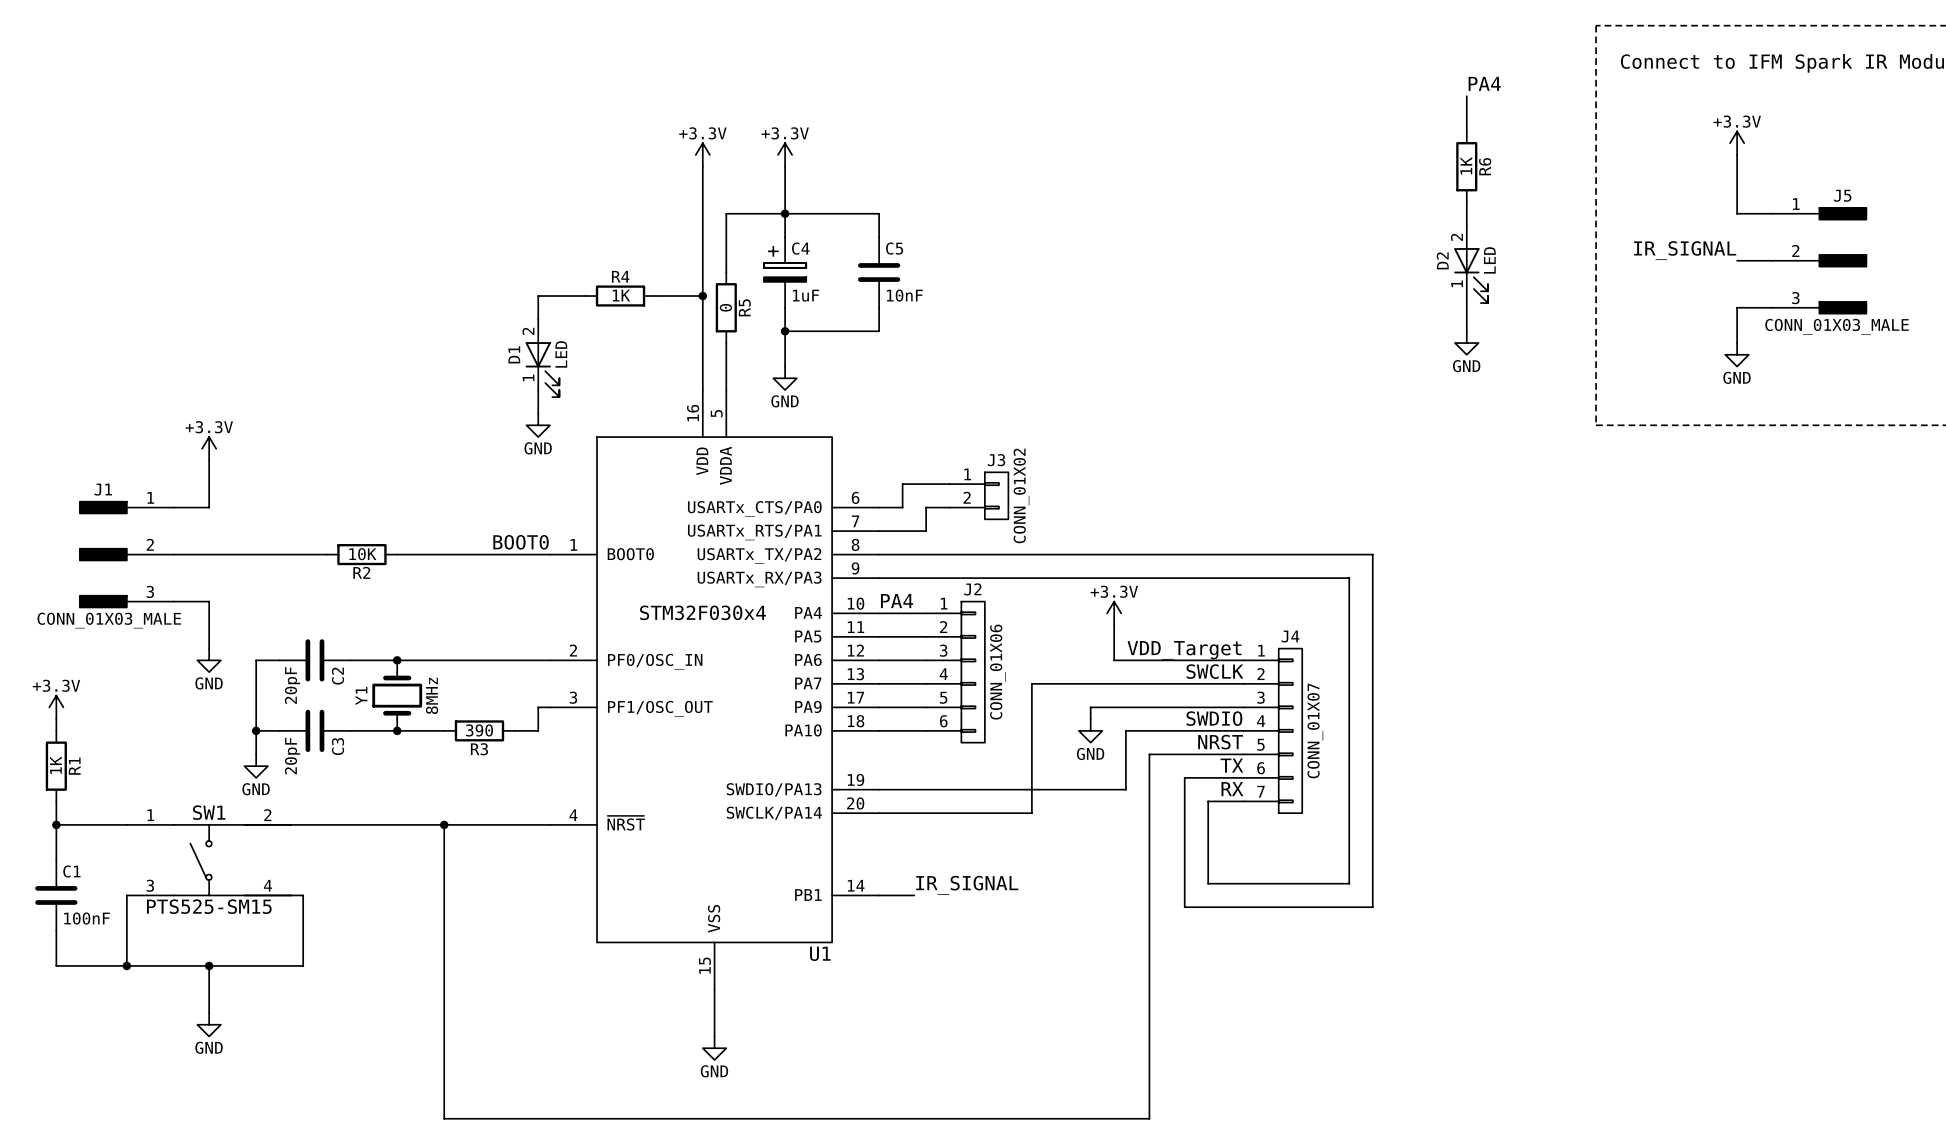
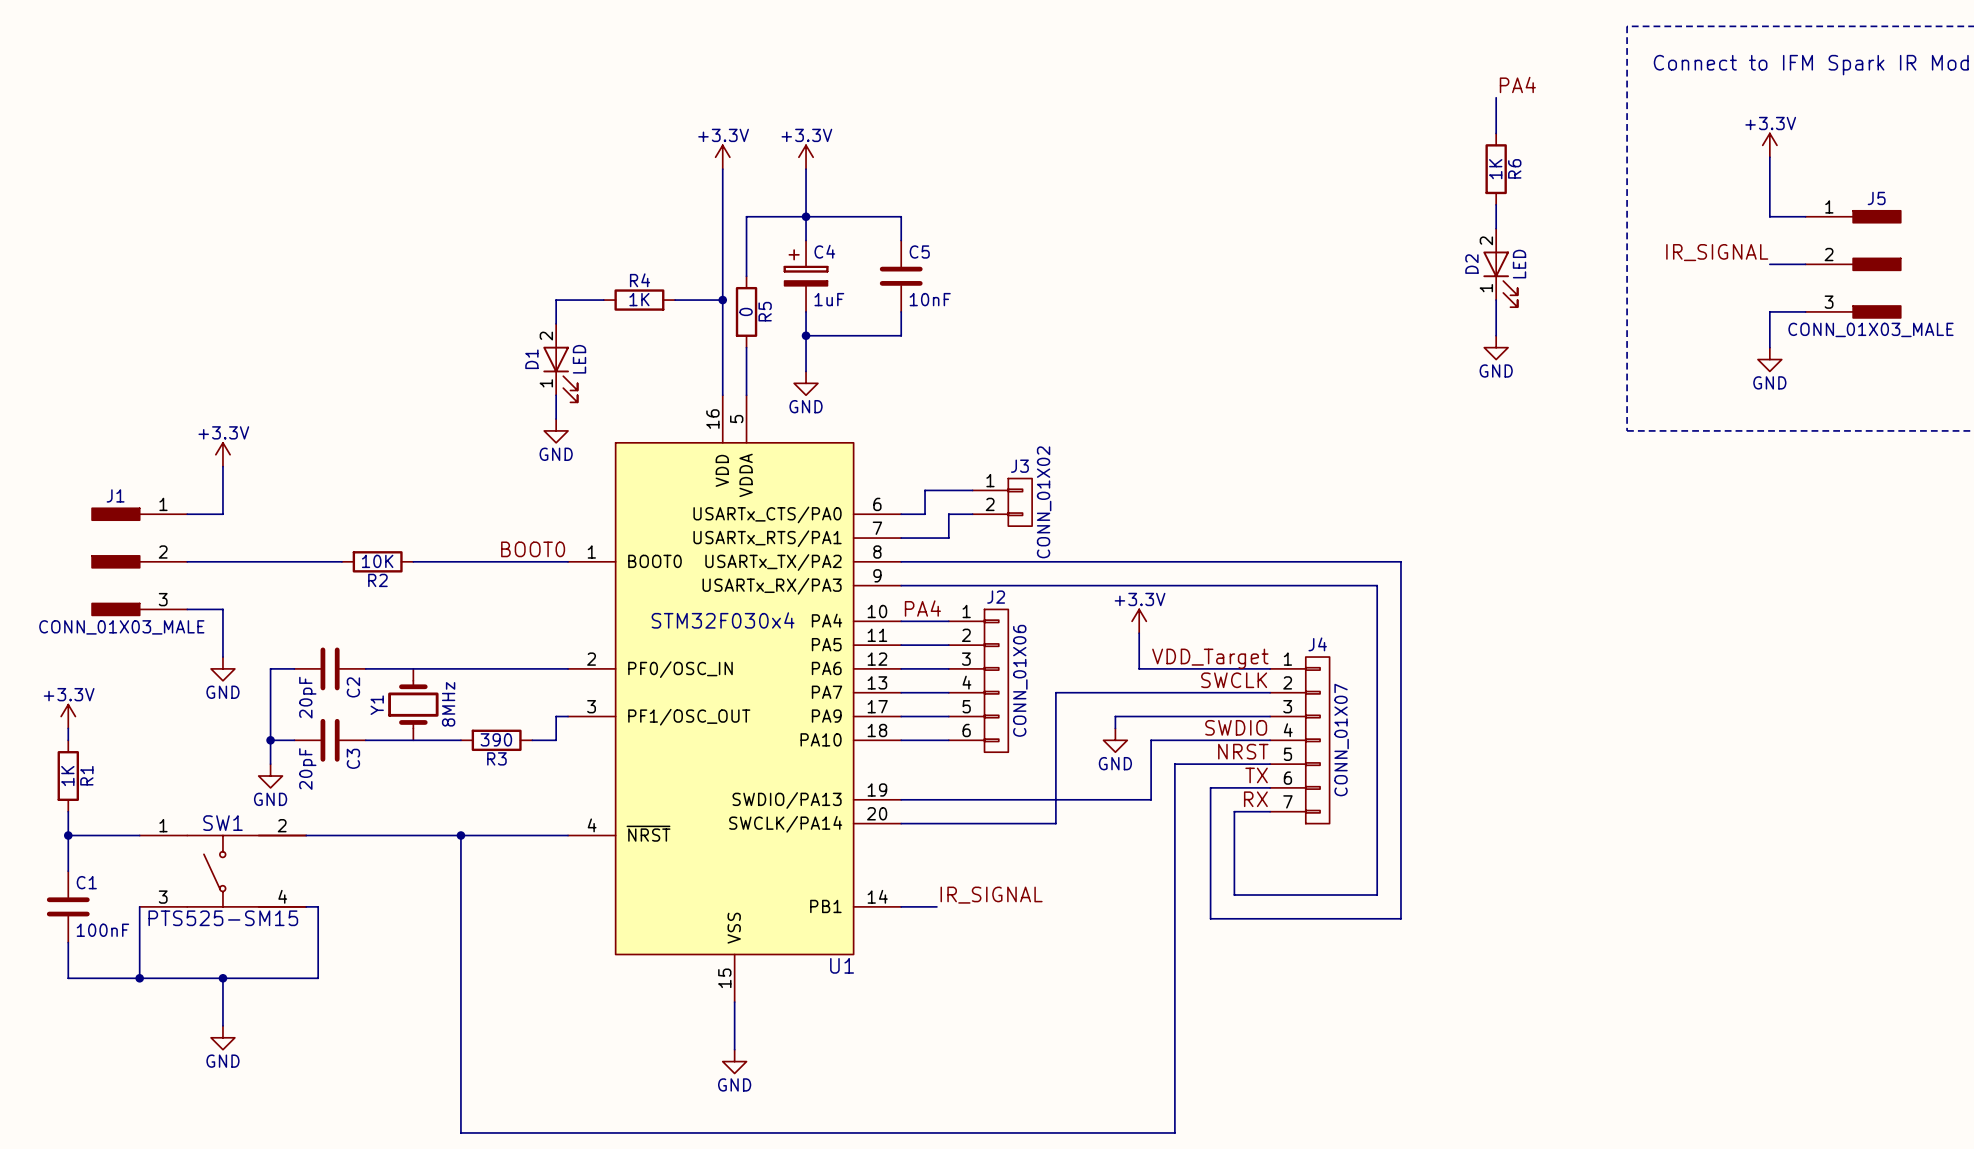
junction: (397, 660) -> none
junction: (397, 730) -> none

